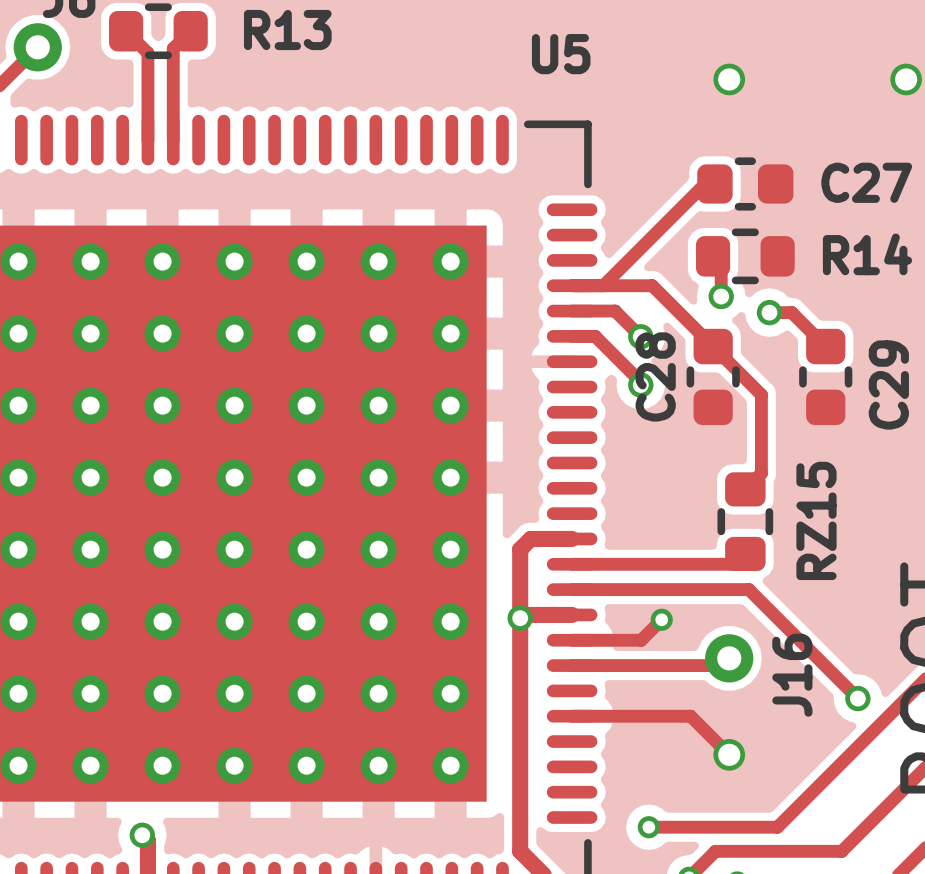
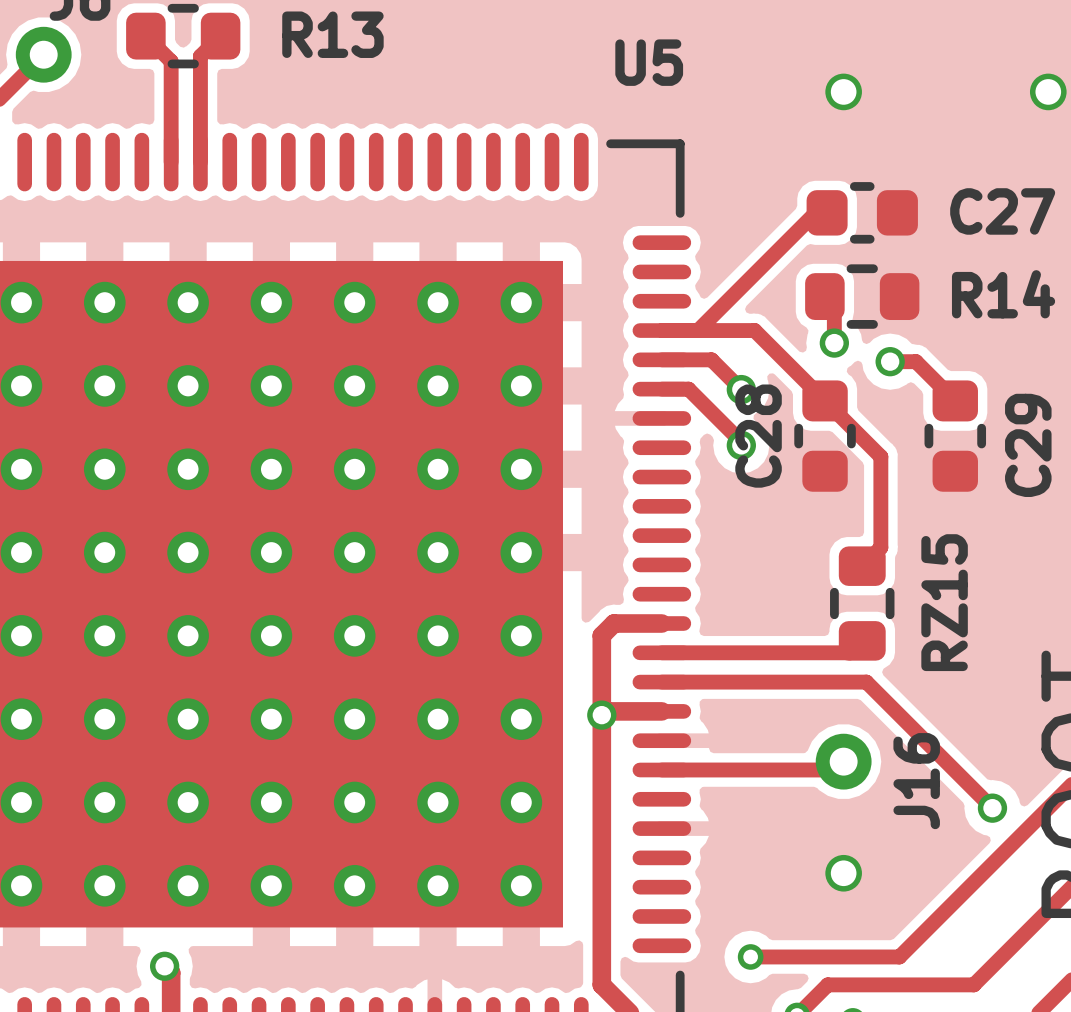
track: (661, 619) (641, 640) (572, 640) -> none
via: (661, 619) -> none
track: (572, 716) (690, 716) (729, 754) -> none

